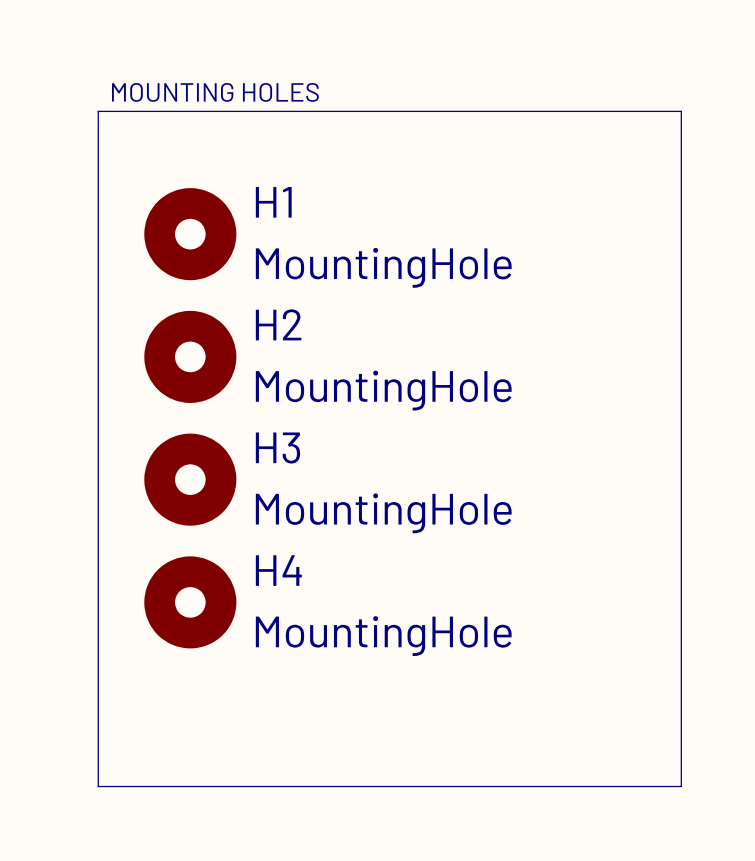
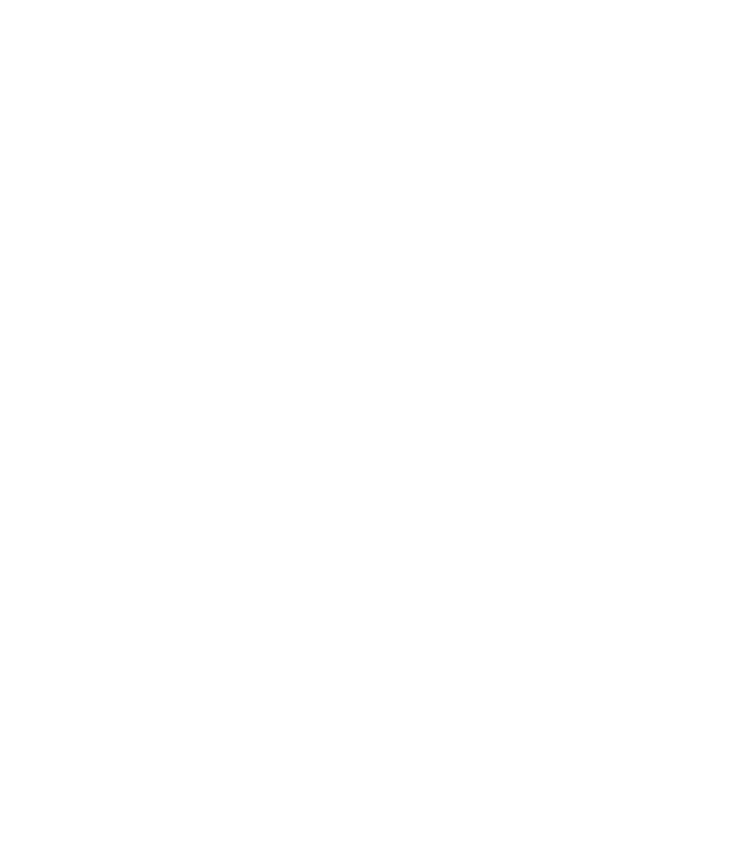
text: MOUNTING HOLES (215, 92) -> none
line: (98, 111) (681, 111) (681, 786) (98, 786) (98, 111) -> none
H1: MountingHole (190, 234) -> none
H2: MountingHole (190, 356) -> none
H3: MountingHole (190, 479) -> none
H4: MountingHole (190, 602) -> none

